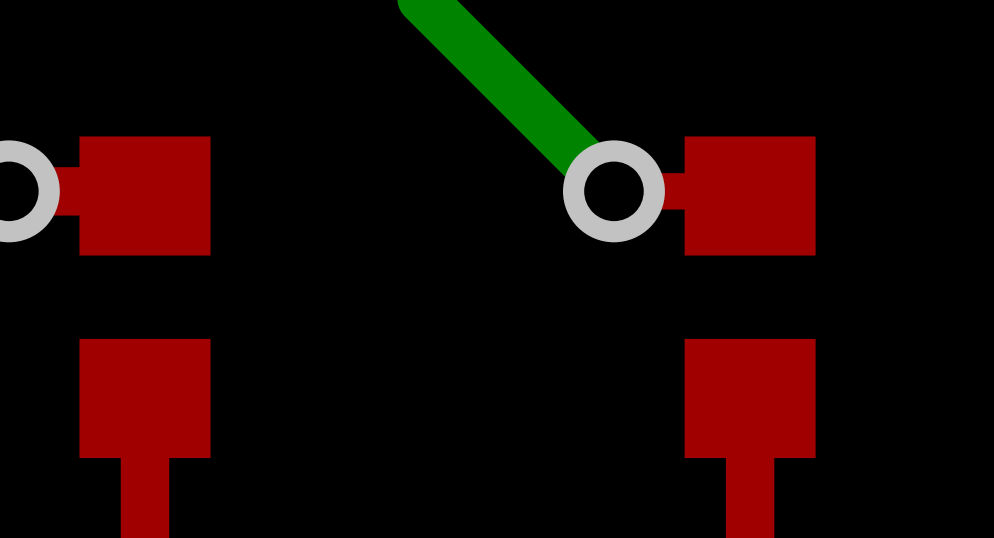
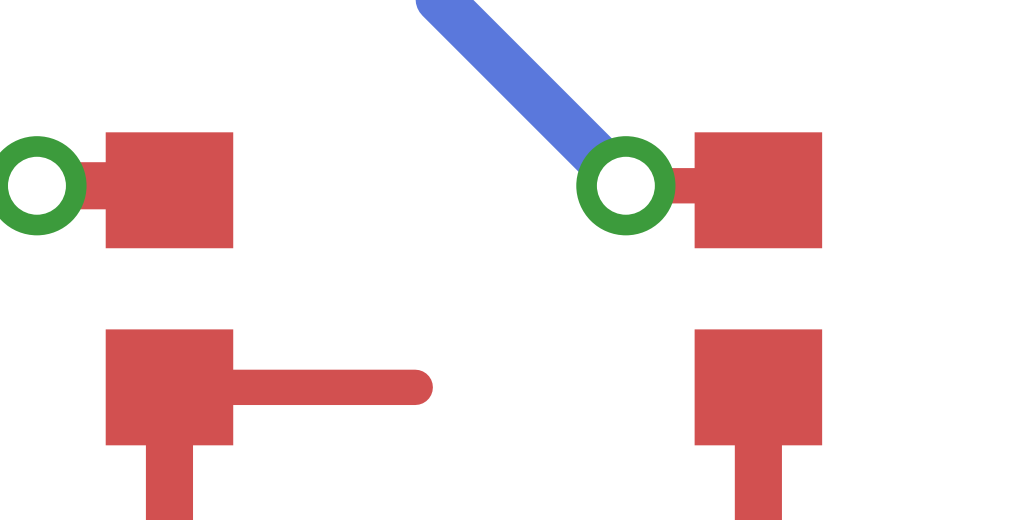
top track: none -> (415, 387) (169, 387)

